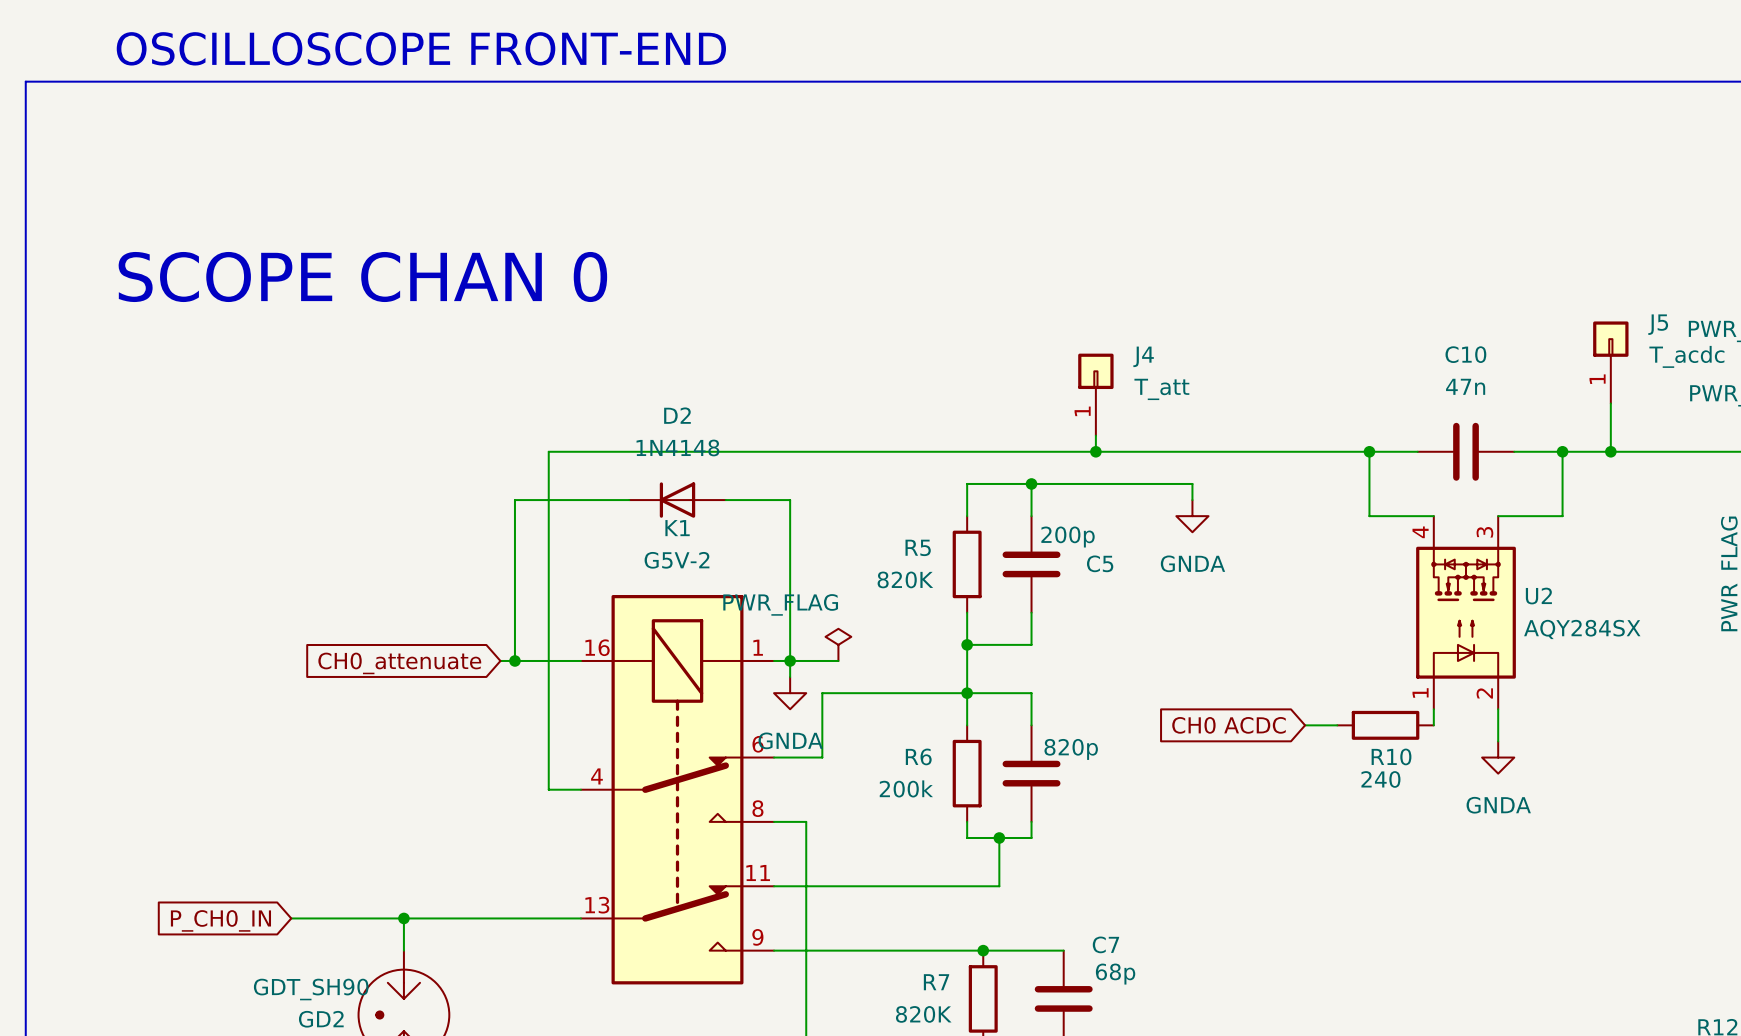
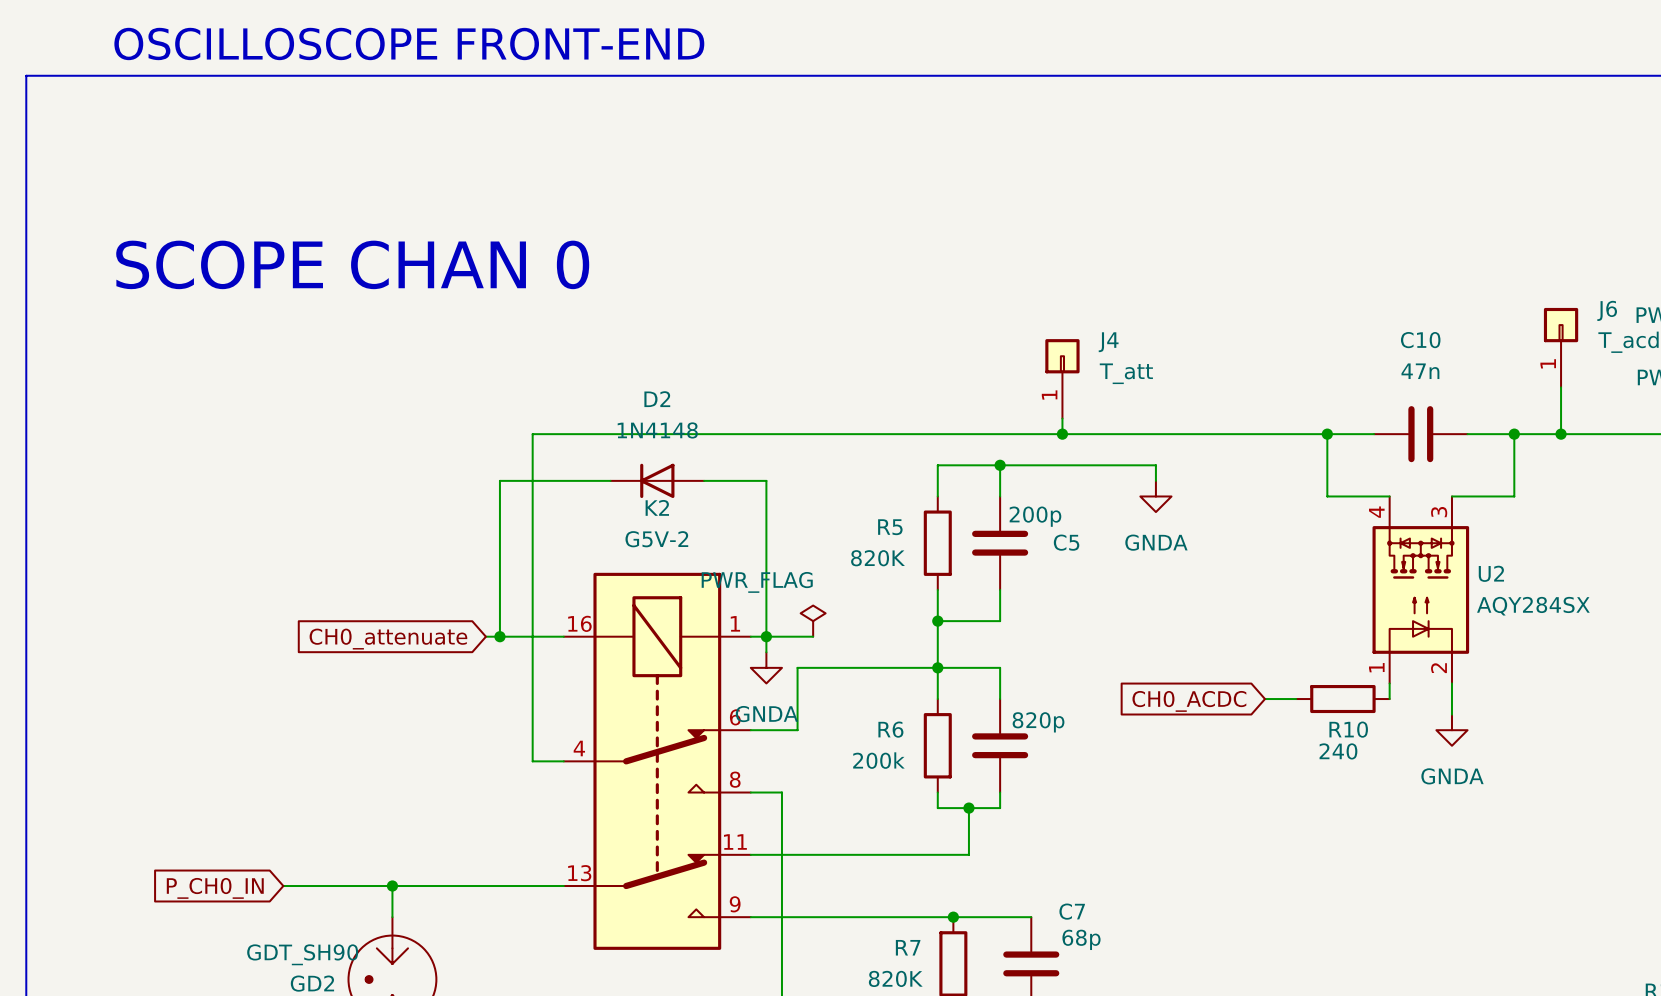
J5 name: J5 (1658, 324) -> J6 (1607, 310)
K1 name: K1 (677, 528) -> K2 (657, 507)
global label: CH0 ACDC (1229, 725) -> CH0_ACDC (1189, 701)

